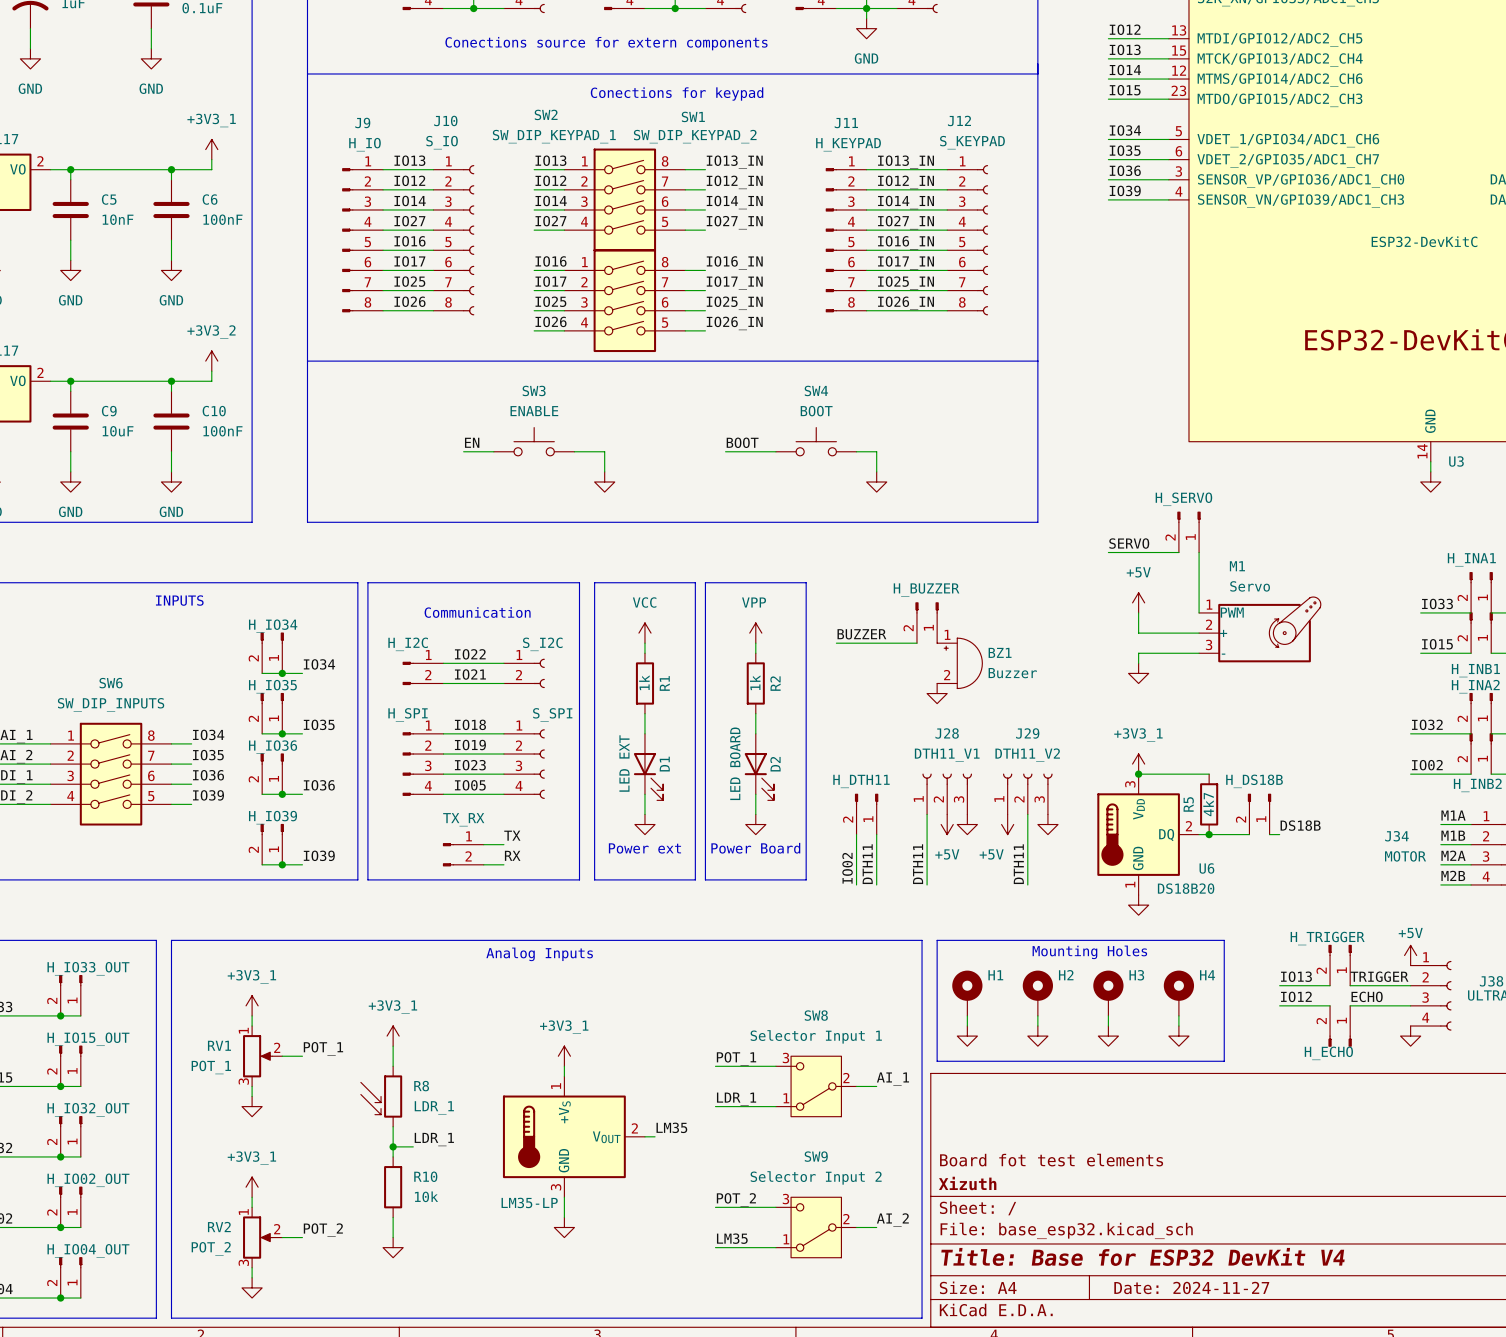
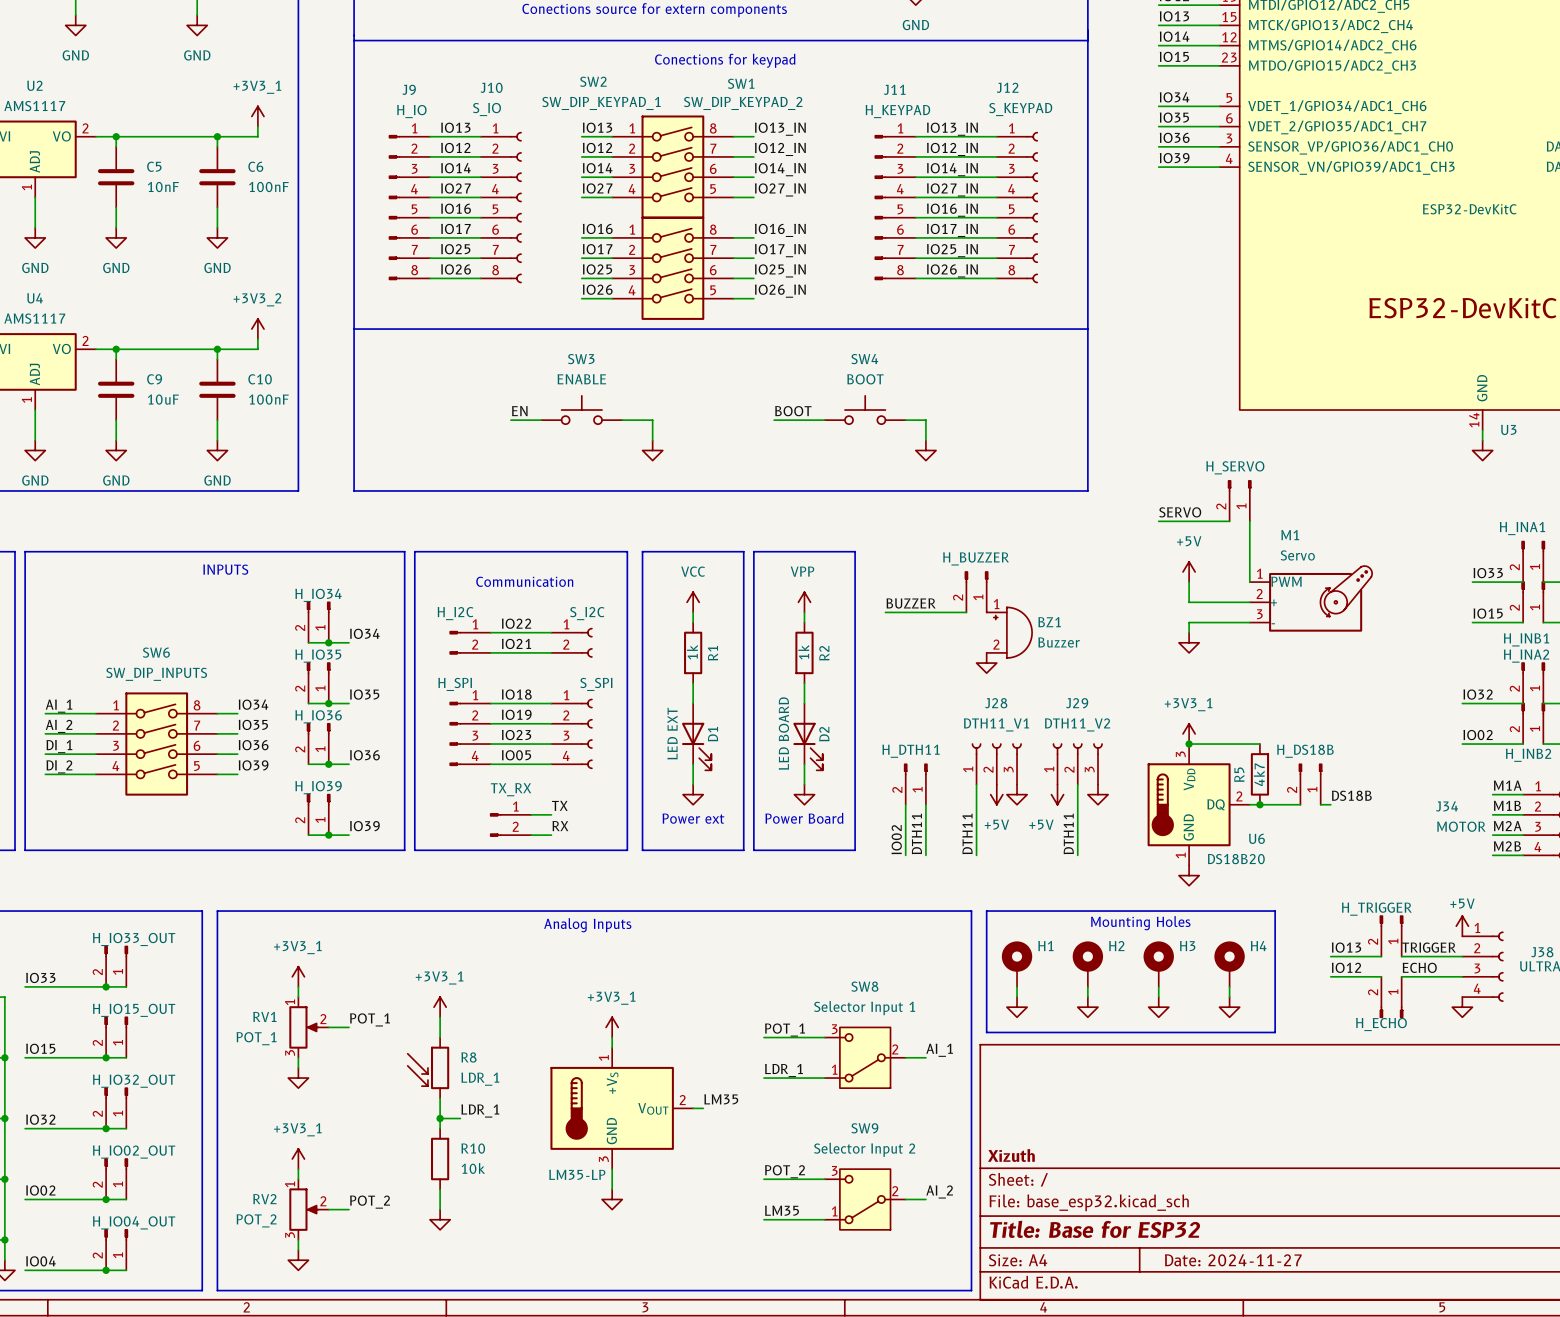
title block: Board fot test elements (1051, 1160) -> none
title block: Title: Base for ESP32 DevKit V4 (1142, 1256) -> Title: Base for ESP32 (1095, 1229)

